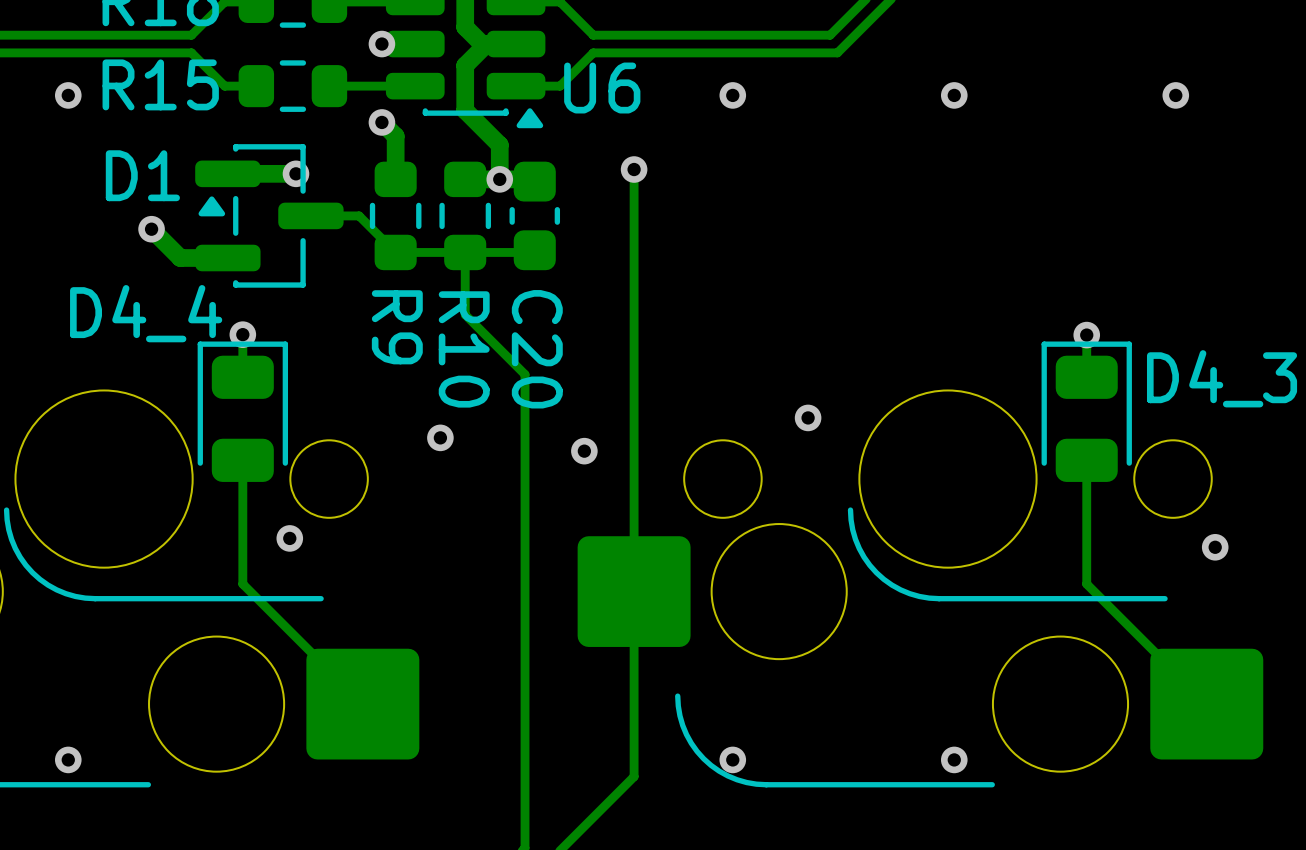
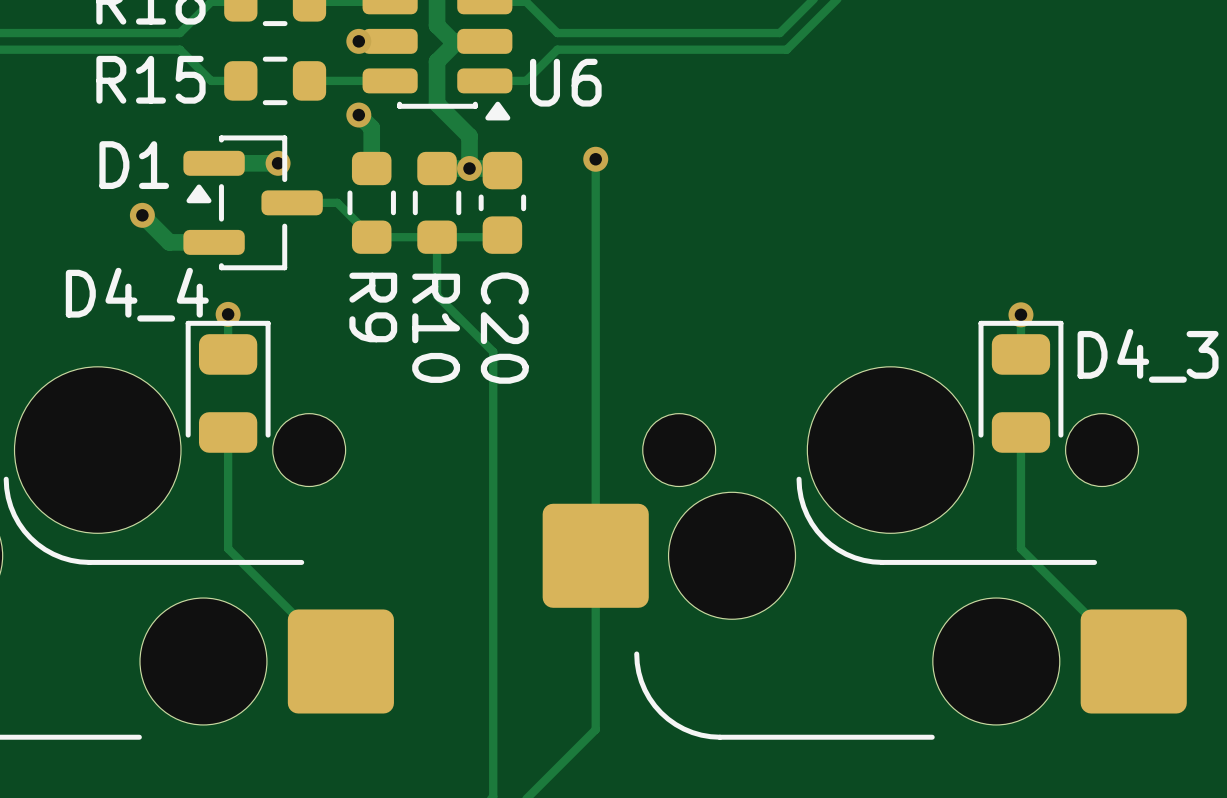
via: (68, 95) -> none
via: (732, 95) -> none
via: (954, 95) -> none
via: (1175, 95) -> none
via: (808, 417) -> none
via: (440, 437) -> none
via: (584, 451) -> none
via: (289, 538) -> none
via: (1215, 547) -> none
via: (68, 759) -> none
via: (732, 759) -> none
via: (954, 759) -> none

